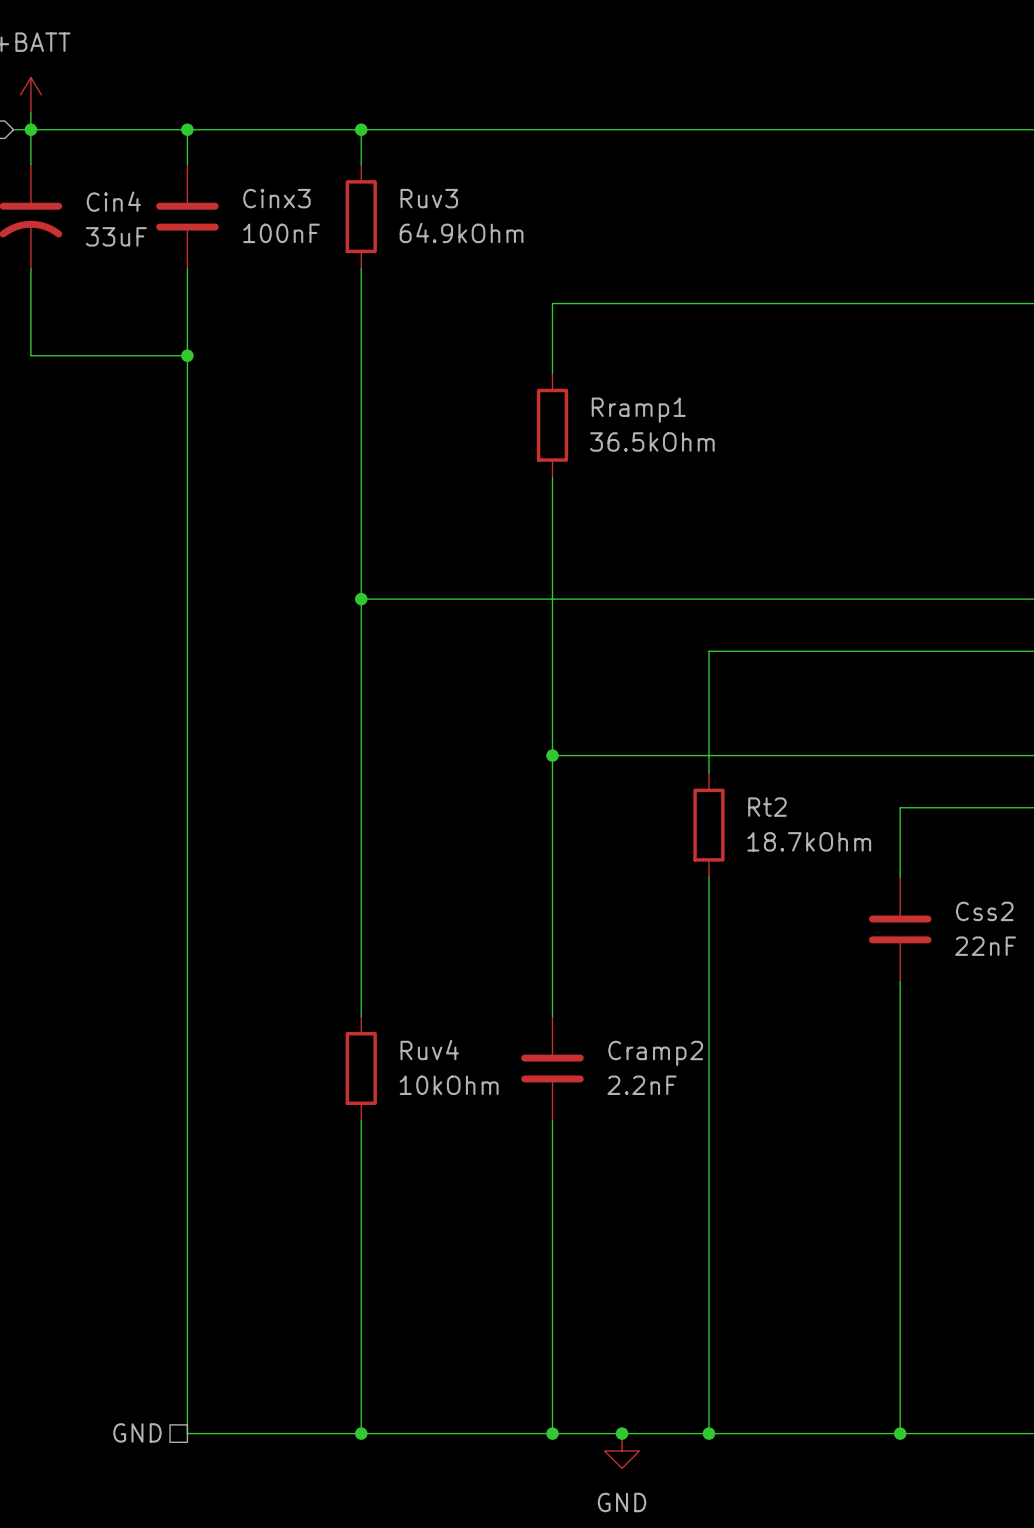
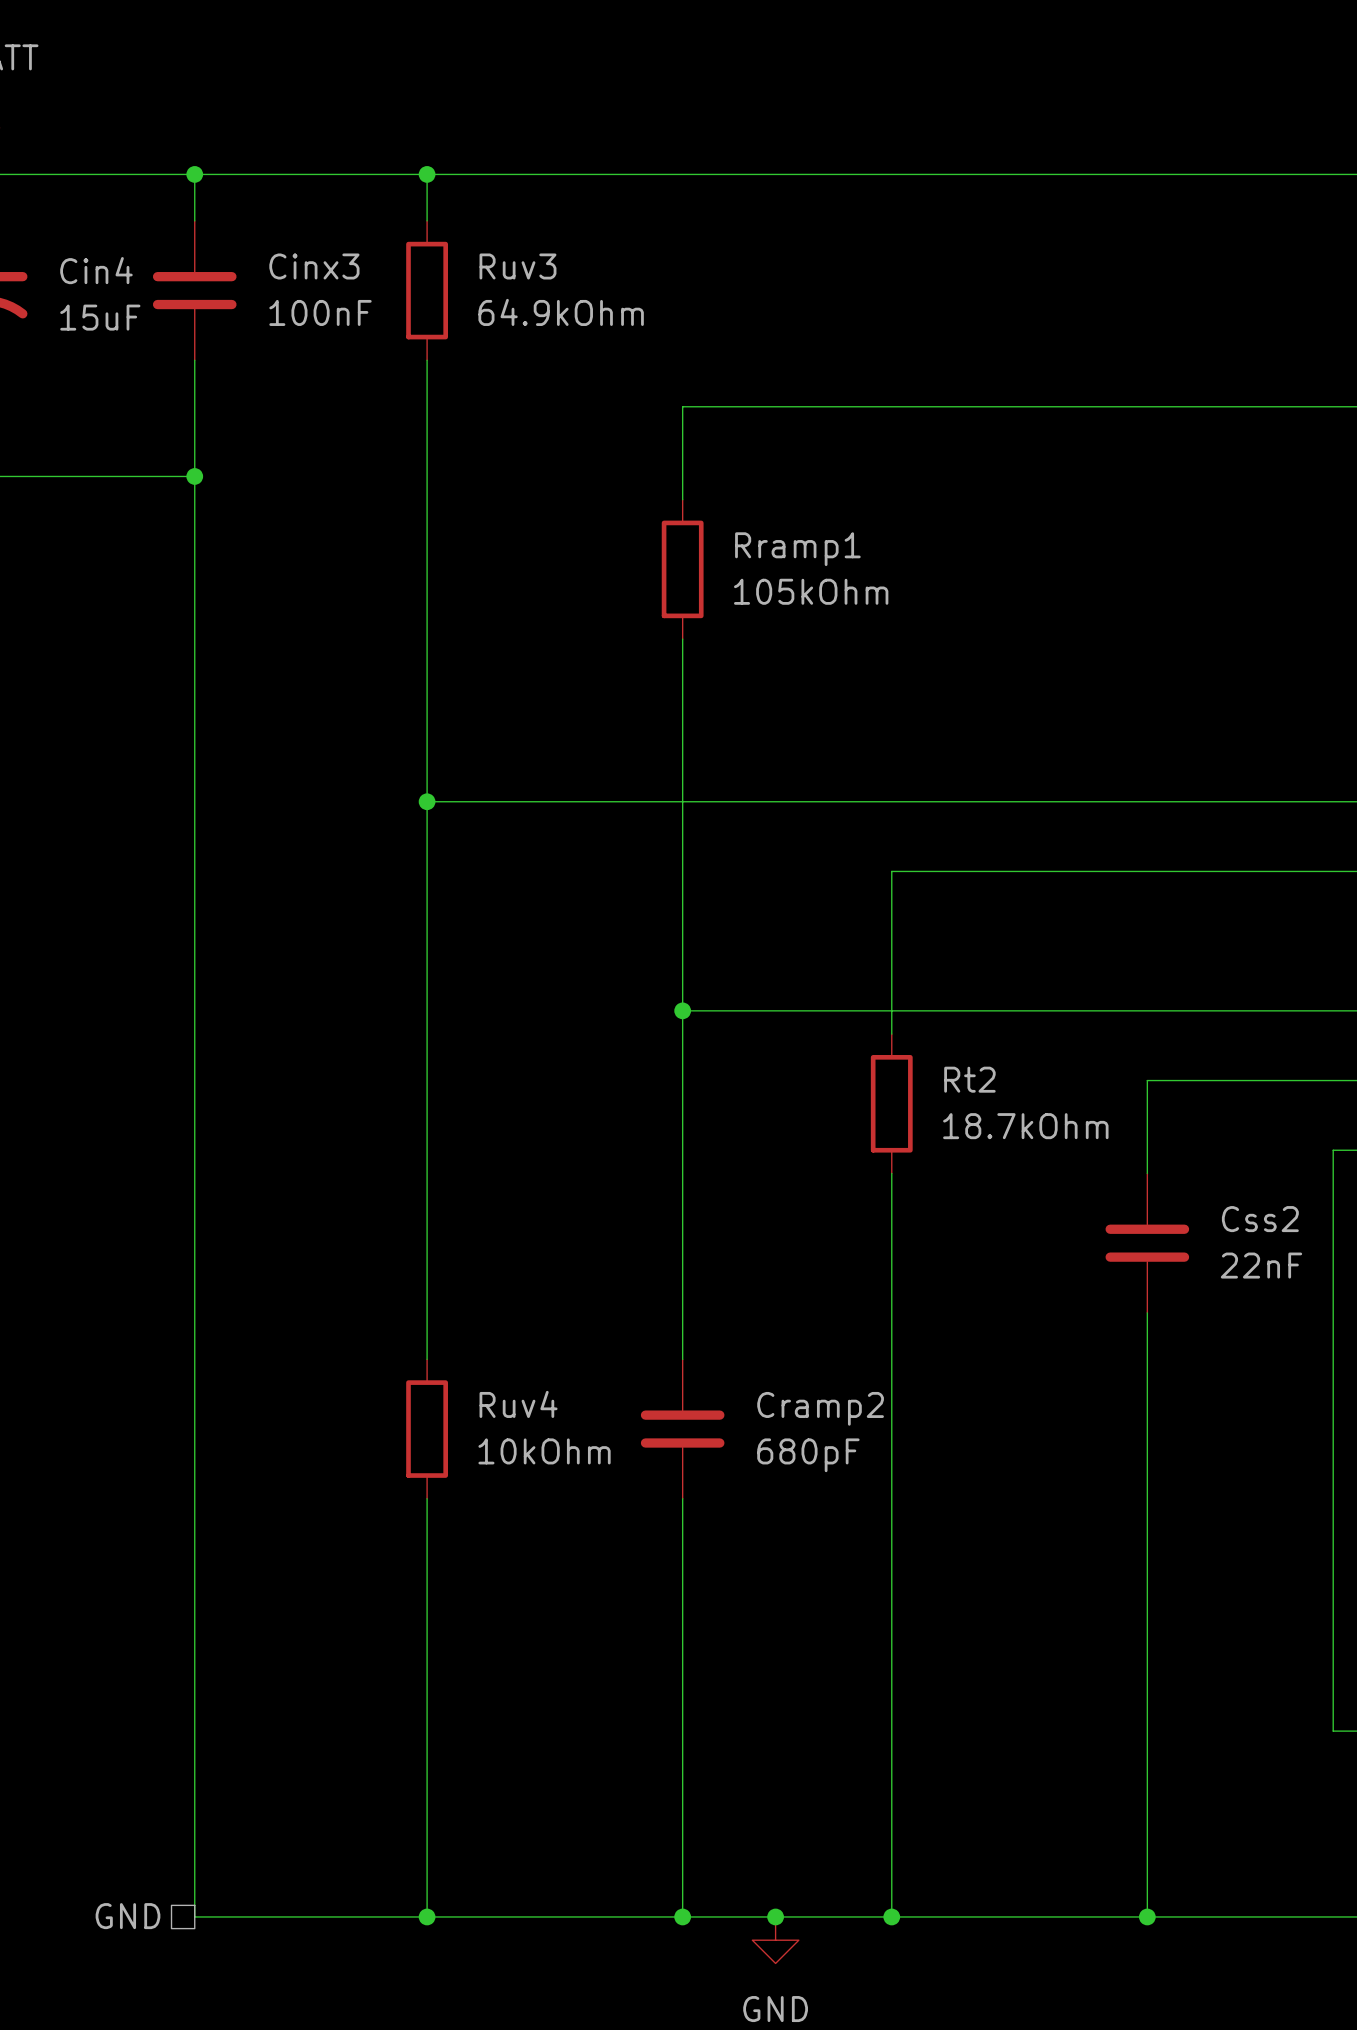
Cin4 value: 33uF (116, 236) -> 15uF (100, 317)
Rramp1 value: 36.5kOhm (652, 442) -> 105kOhm (811, 591)
Cramp2 value: 2.2nF (642, 1085) -> 680pF (808, 1455)

